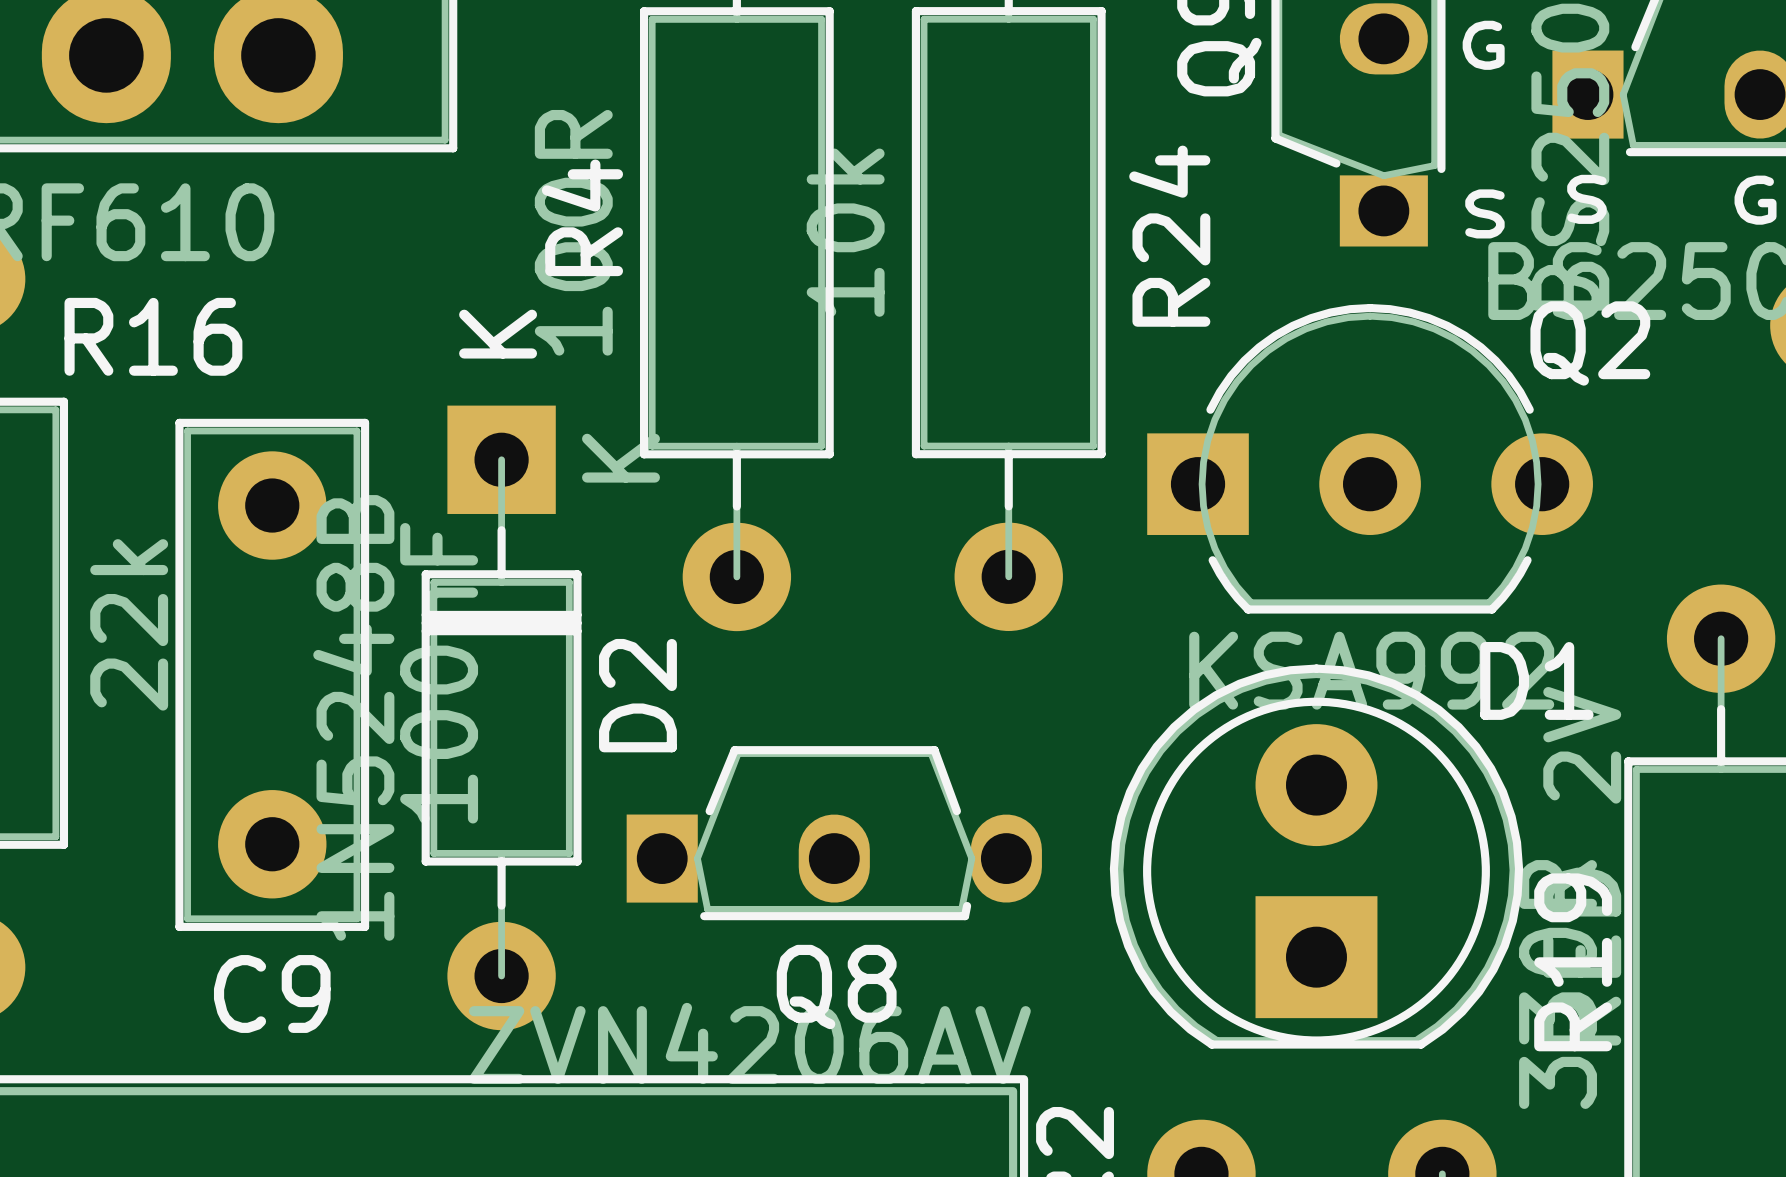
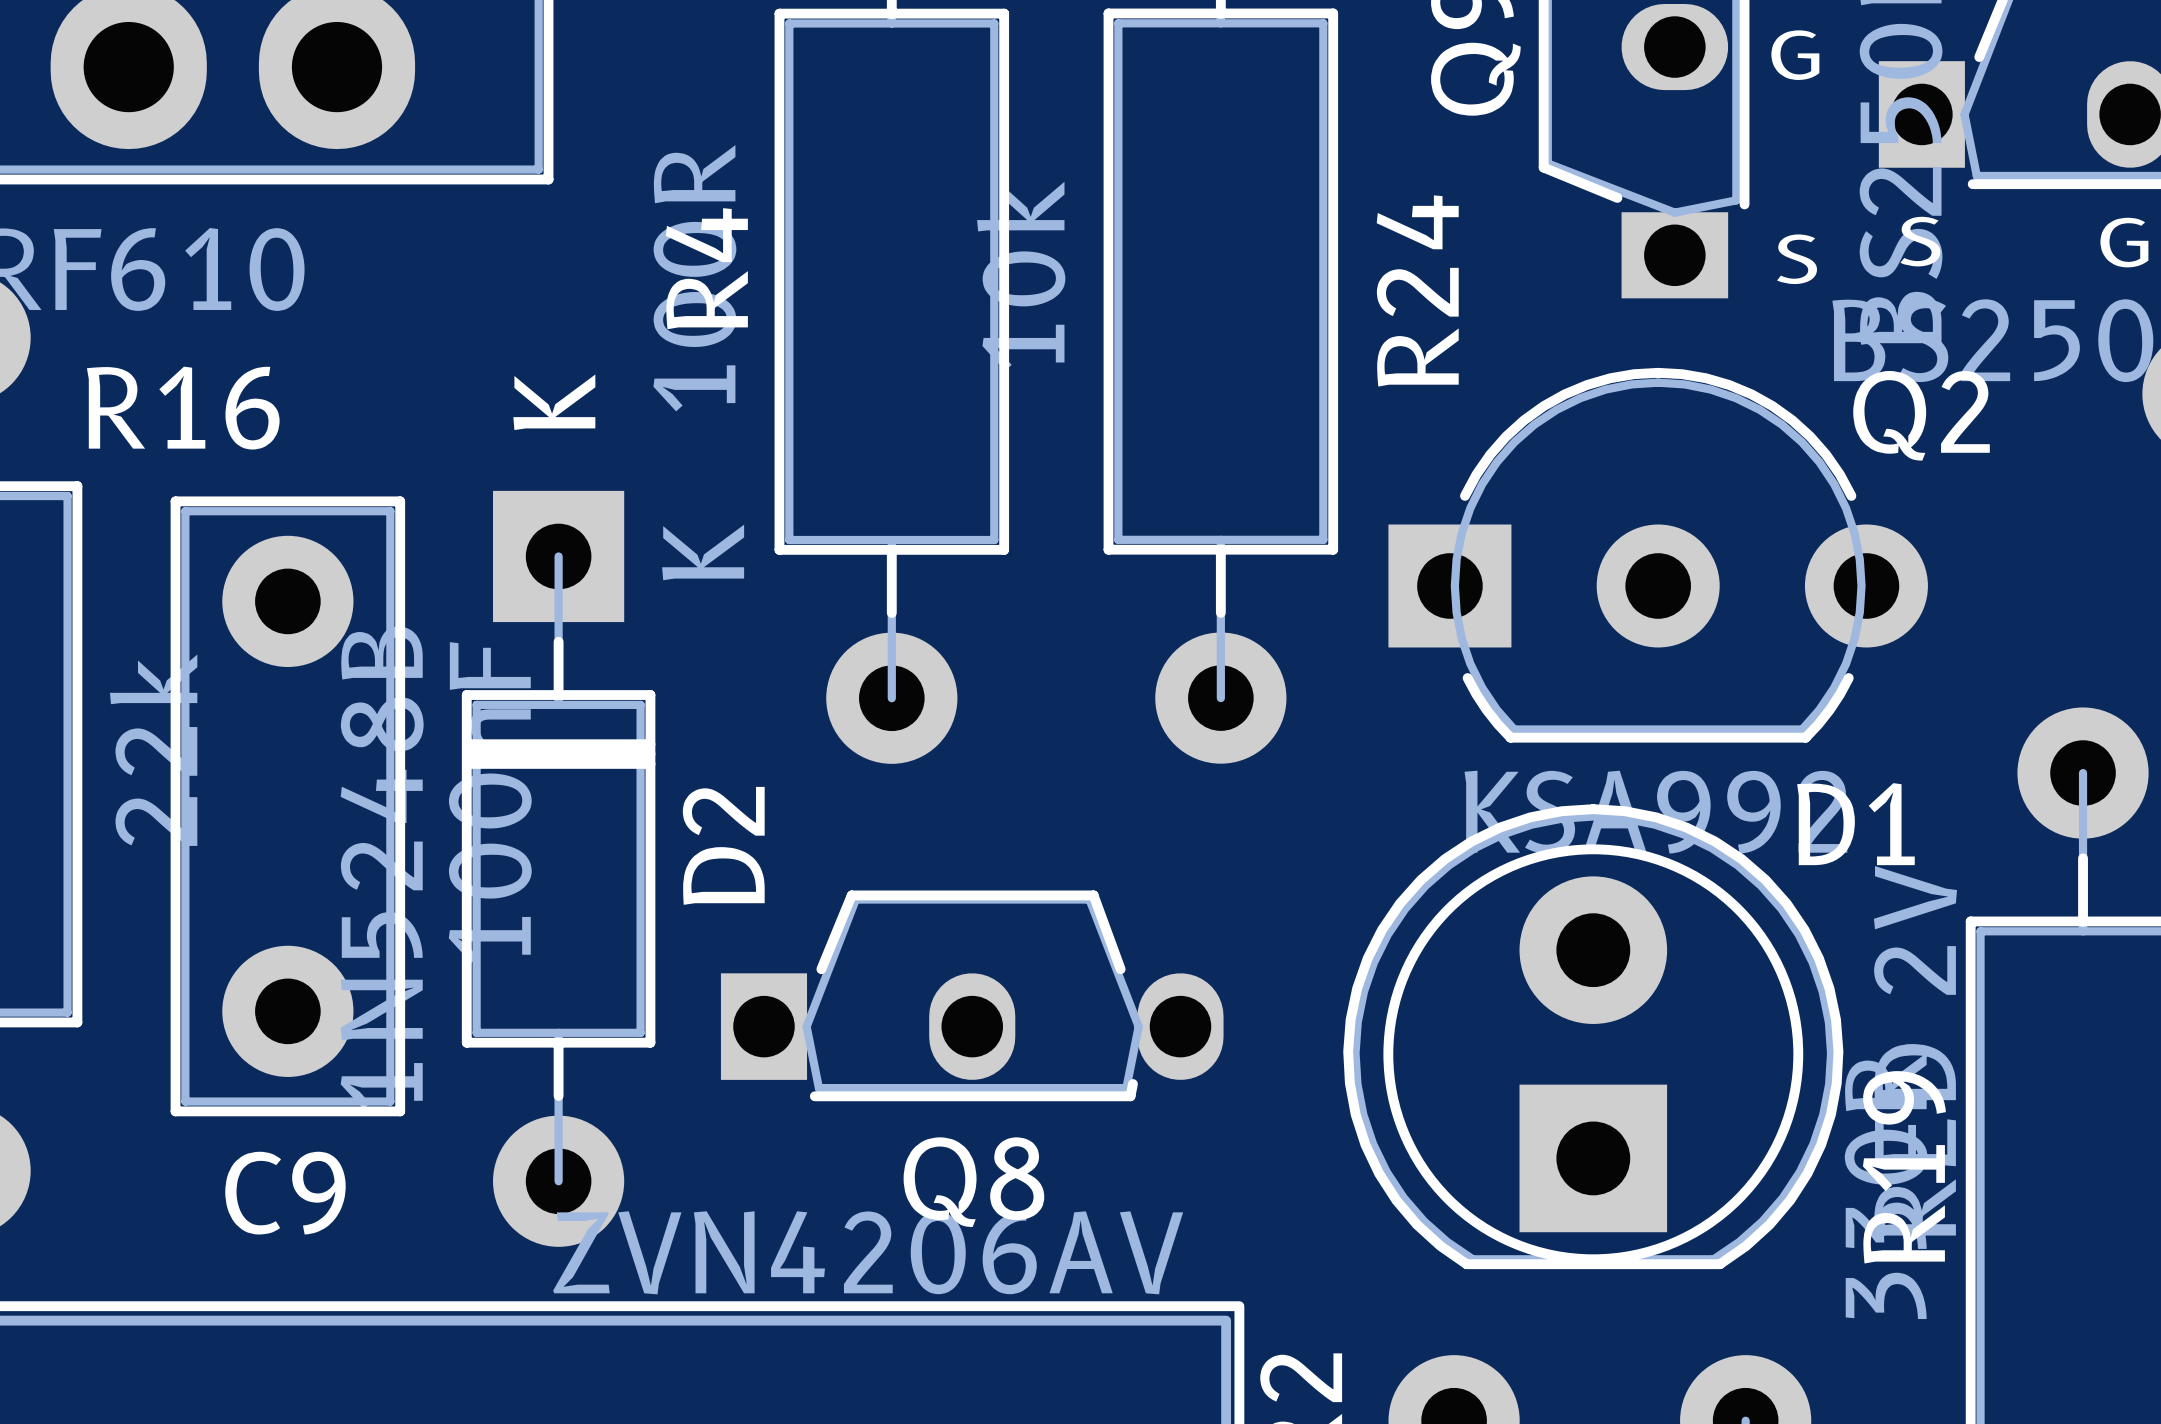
C9 position: (272, 674) -> (287, 806)
D2 position: (501, 717) -> (558, 868)
Q8 position: (834, 833) -> (972, 995)

